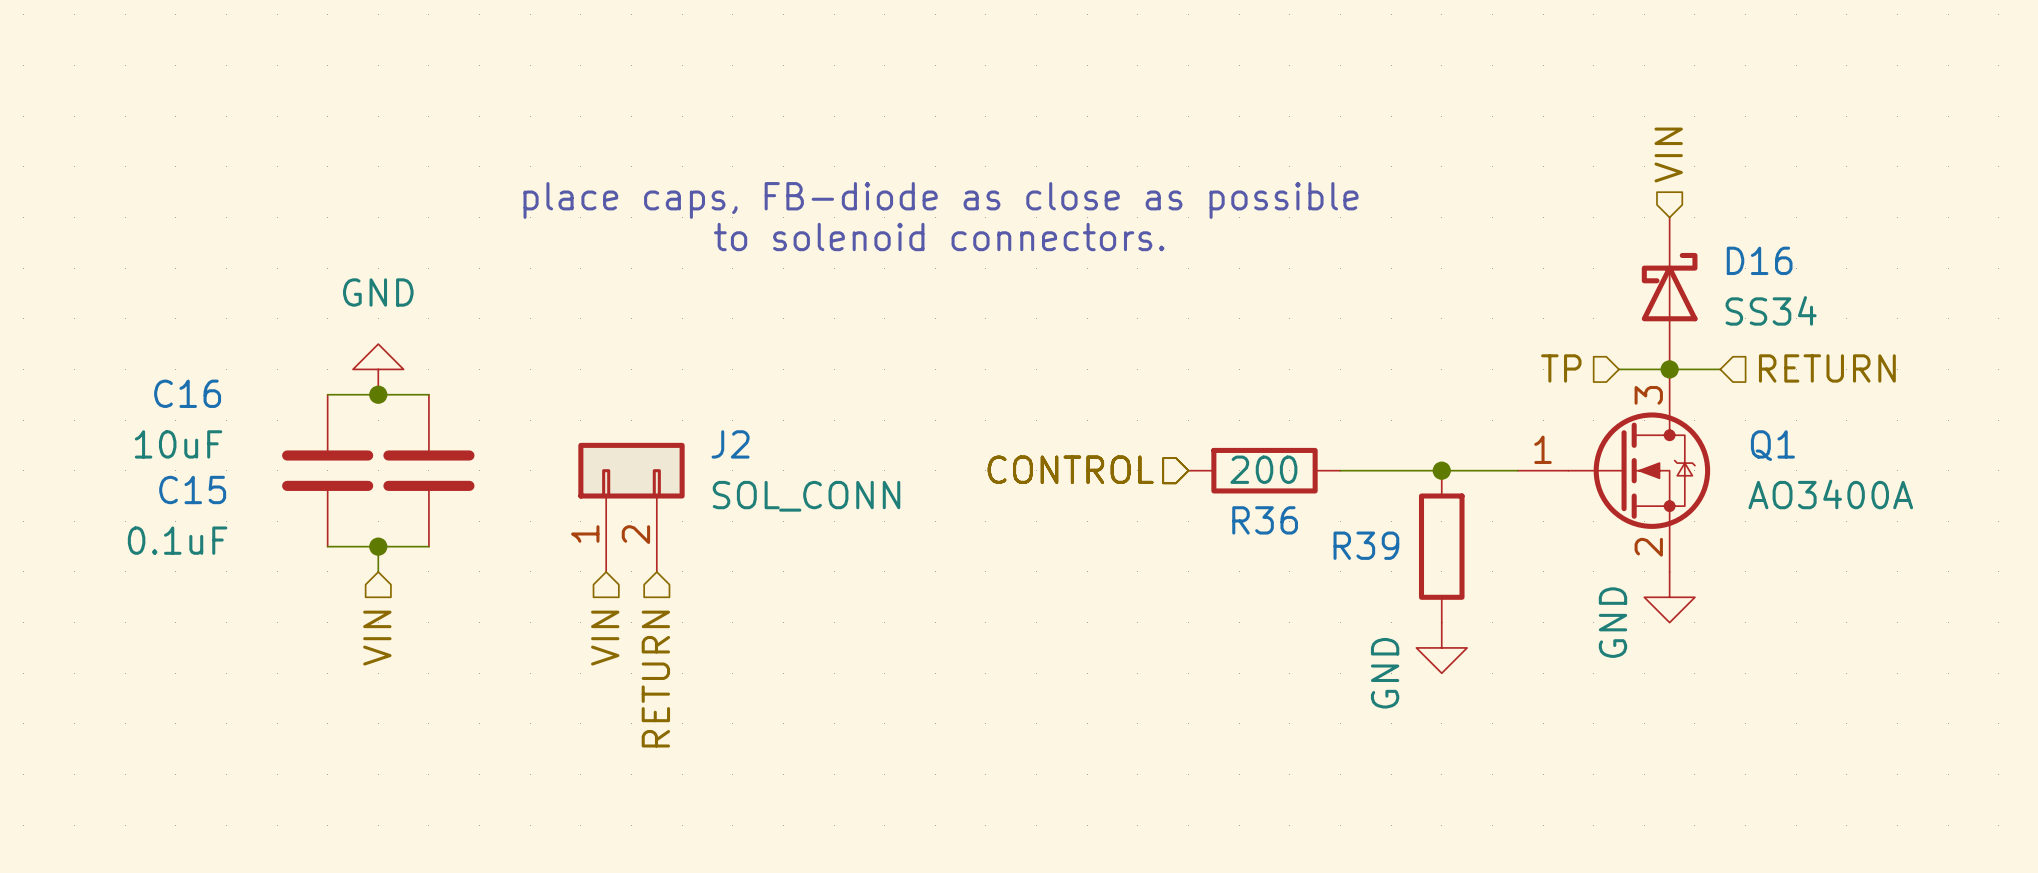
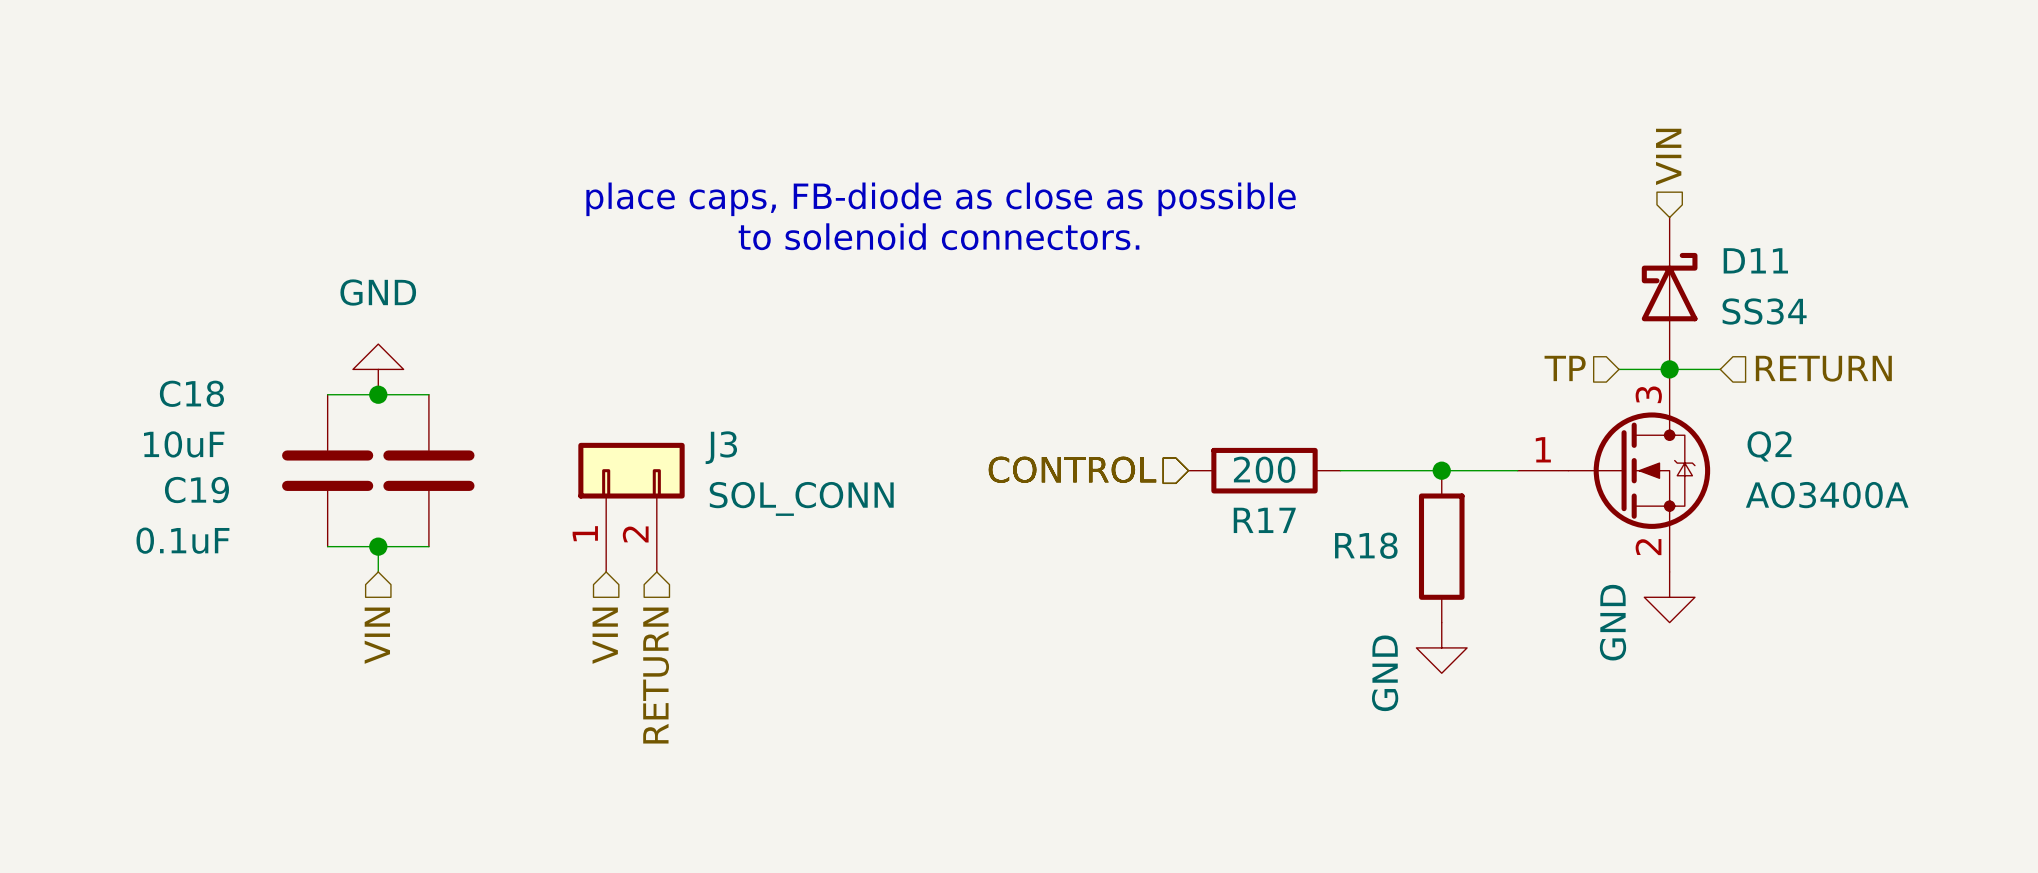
D16 name: D16 (1759, 260) -> D11 (1755, 260)
C16 name: C16 (187, 393) -> C18 (191, 393)
J2 name: J2 (730, 444) -> J3 (721, 447)
Q1 name: Q1 (1772, 445) -> Q2 (1769, 446)
C15 name: C15 (192, 490) -> C19 (196, 490)
R36 name: R36 (1265, 520) -> R17 (1264, 520)
R39 name: R39 (1366, 545) -> R18 (1366, 545)

